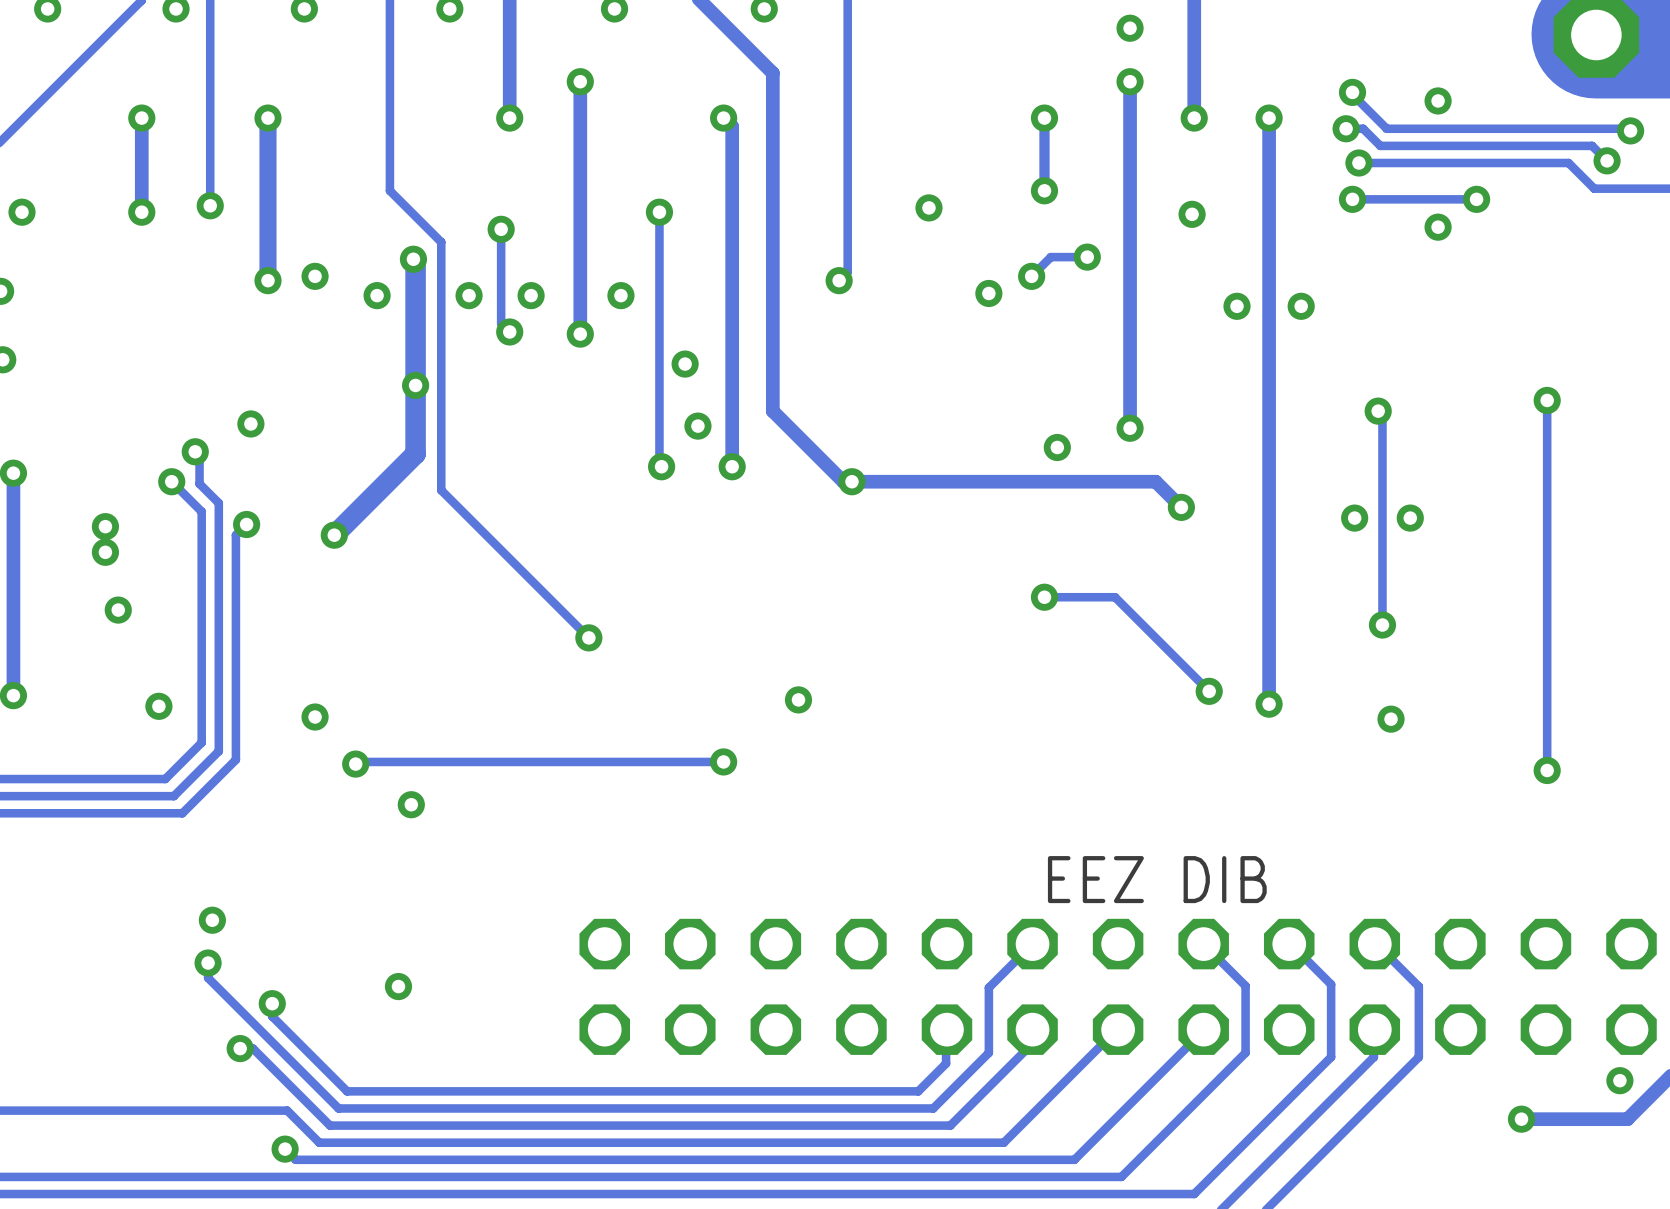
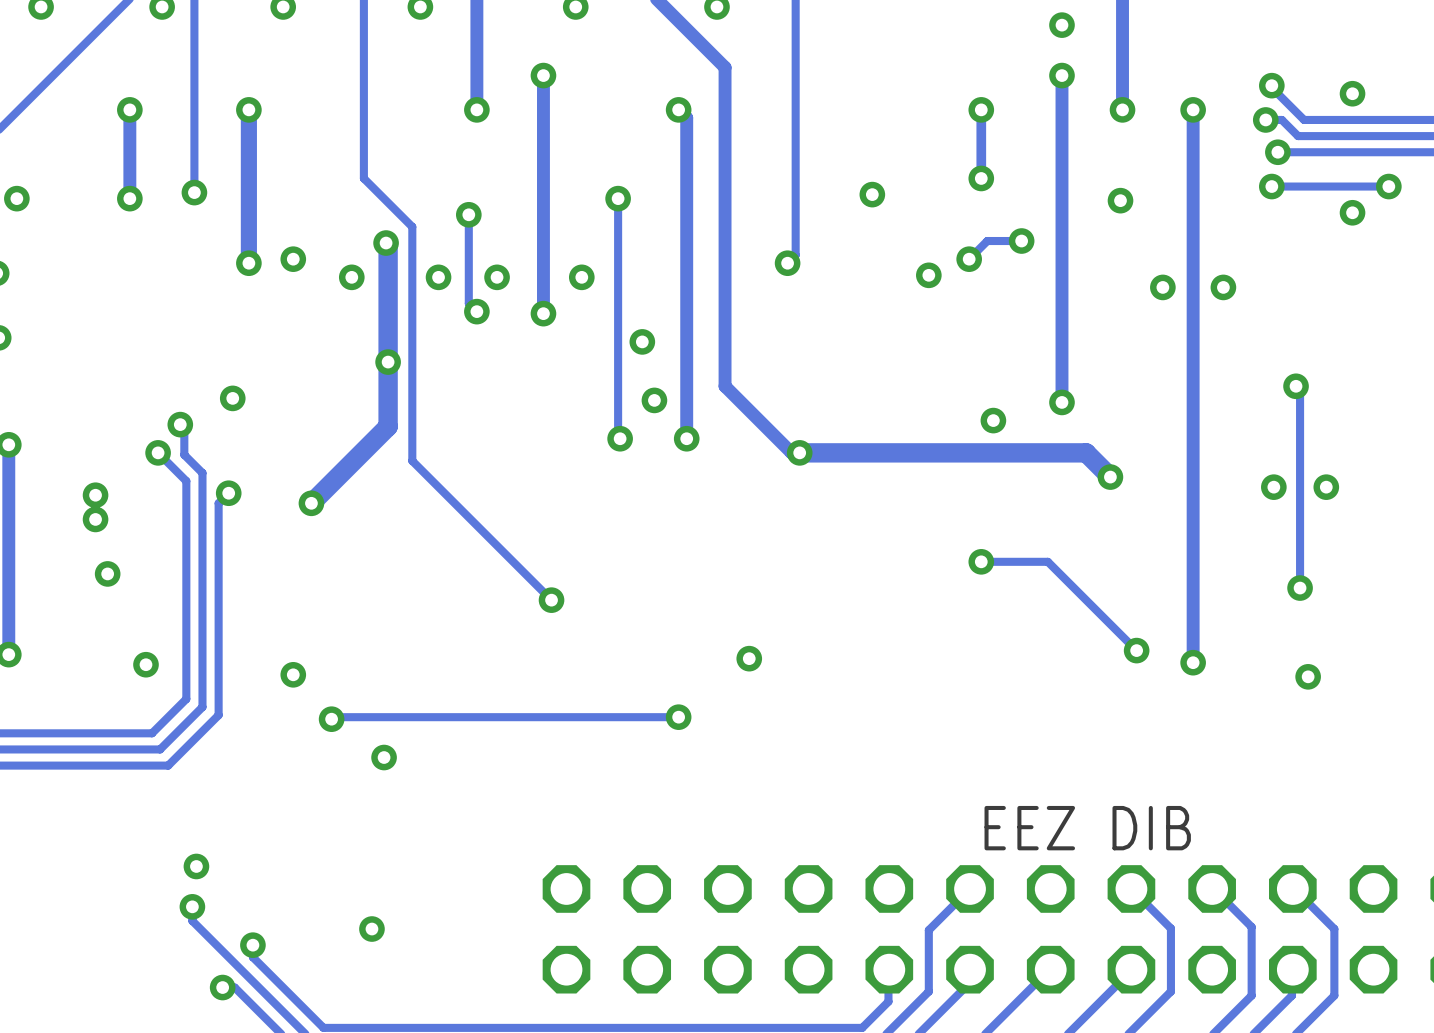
track width: thin (851, 481) (1155, 481) (1181, 507) -> thick (799, 452) (1086, 452) (1110, 477)

